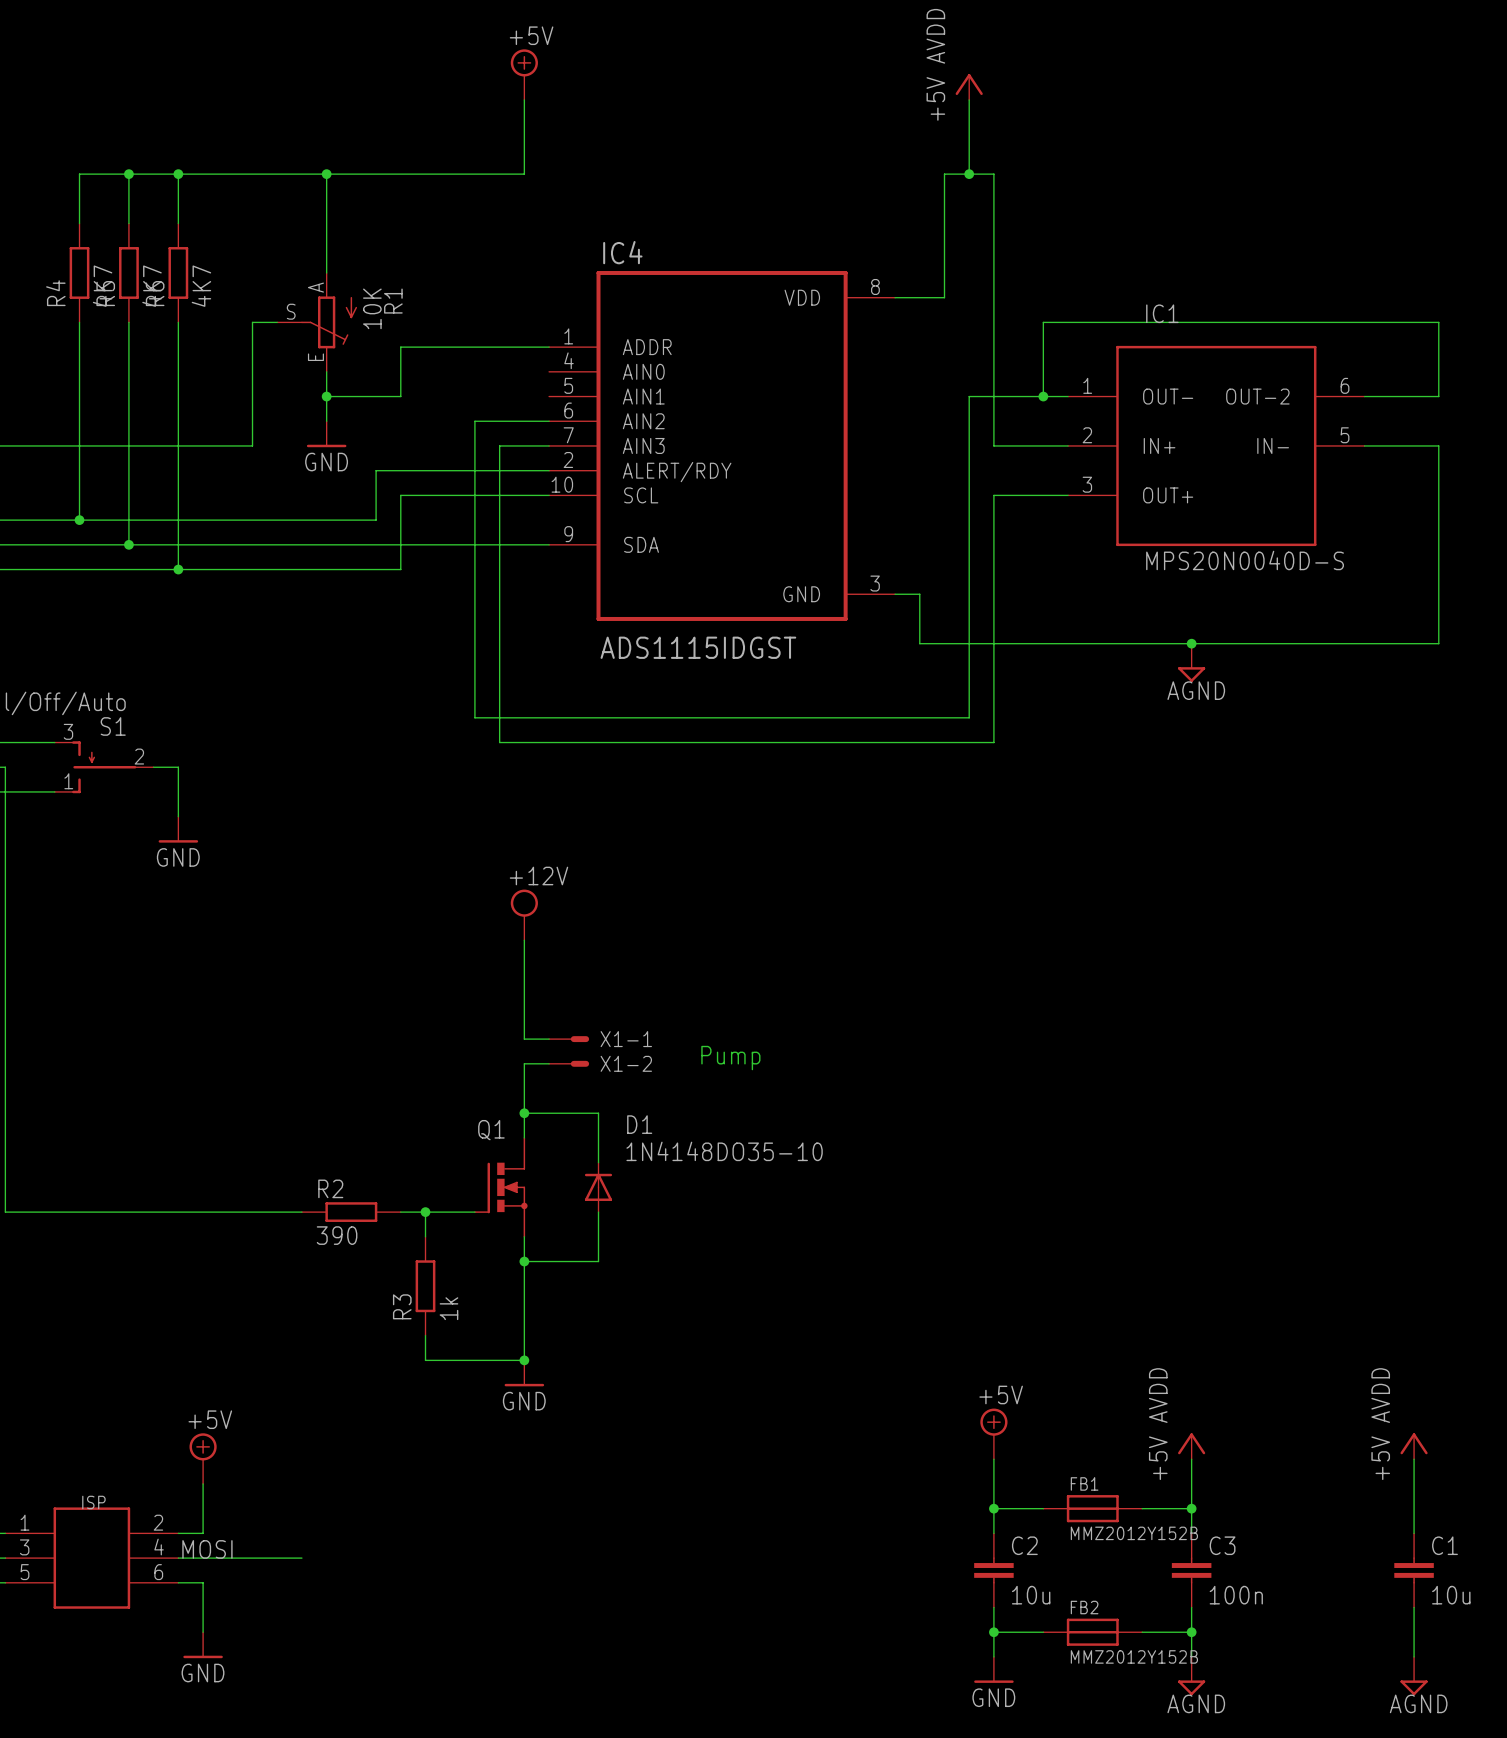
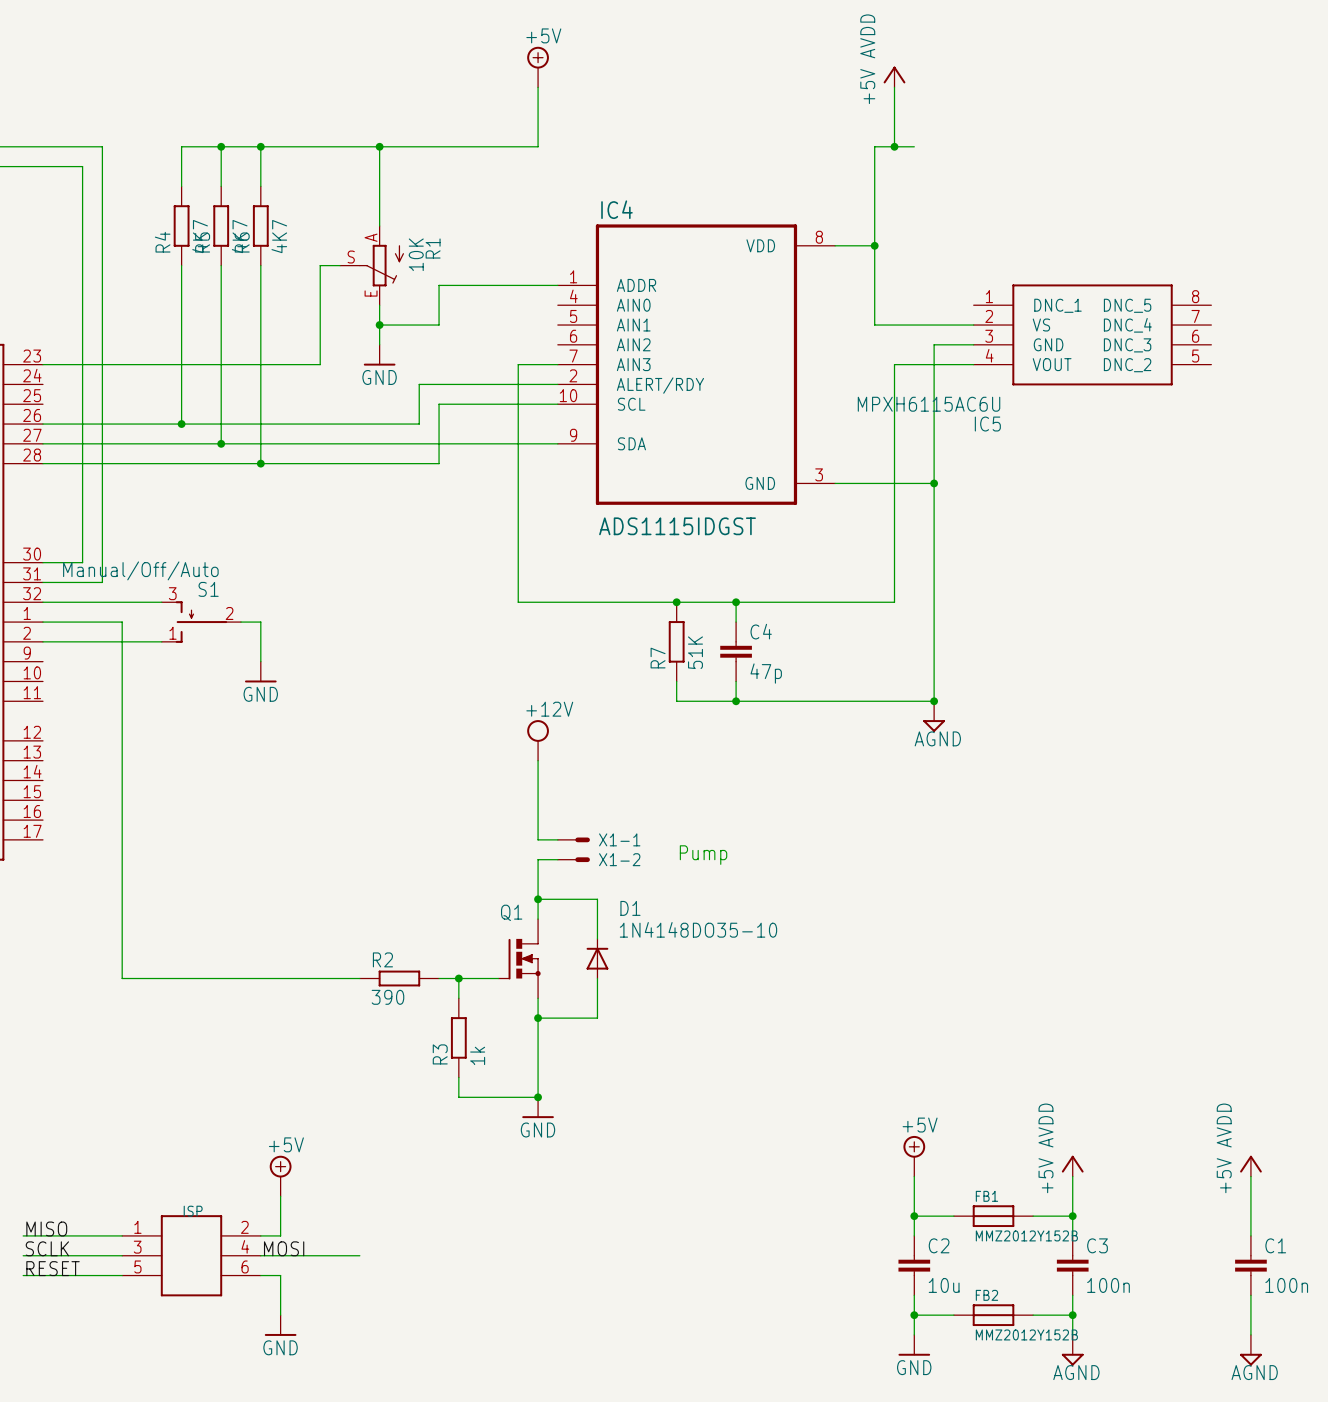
wire: (993, 174) (993, 445) -> none
wire: none -> (874, 245) (874, 325) (894, 325)
junction: none -> (874, 245)
wire: (969, 396) (969, 445) -> (914, 364) (894, 364)
wire: (1043, 396) (1043, 322) (1438, 322) (1438, 396) (1364, 396) -> none
junction: (1043, 396) -> none
IC5: none -> MPXH6115AC6U (1092, 334)
wire: (549, 421) (474, 421) (474, 717) (969, 717) -> none
wire: none -> (973, 344) (934, 344) (934, 701) (676, 701) (676, 681)
IC1: MPS20N0040D-S (1216, 445) -> none
wire: (1364, 445) (1438, 445) (1438, 643) (919, 643) (919, 594) -> (934, 483) (854, 483)
wire: (1068, 495) (993, 495) (993, 742) (969, 742) -> (894, 582) (894, 602)
junction: none -> (934, 483)
junction: (1191, 643) -> none
power symbol: AGND (1191, 662) -> none
junction: none -> (676, 602)
wire: none -> (736, 602) (736, 622)
junction: none -> (736, 602)
R7: none -> 51K (676, 641)
C4: none -> 47p (736, 651)
wire: none -> (736, 681) (736, 701)
junction: none -> (736, 701)
junction: none -> (934, 701)
power symbol: none -> AGND (934, 716)
C1 value: 10u (1451, 1595) -> 100n (1286, 1285)

